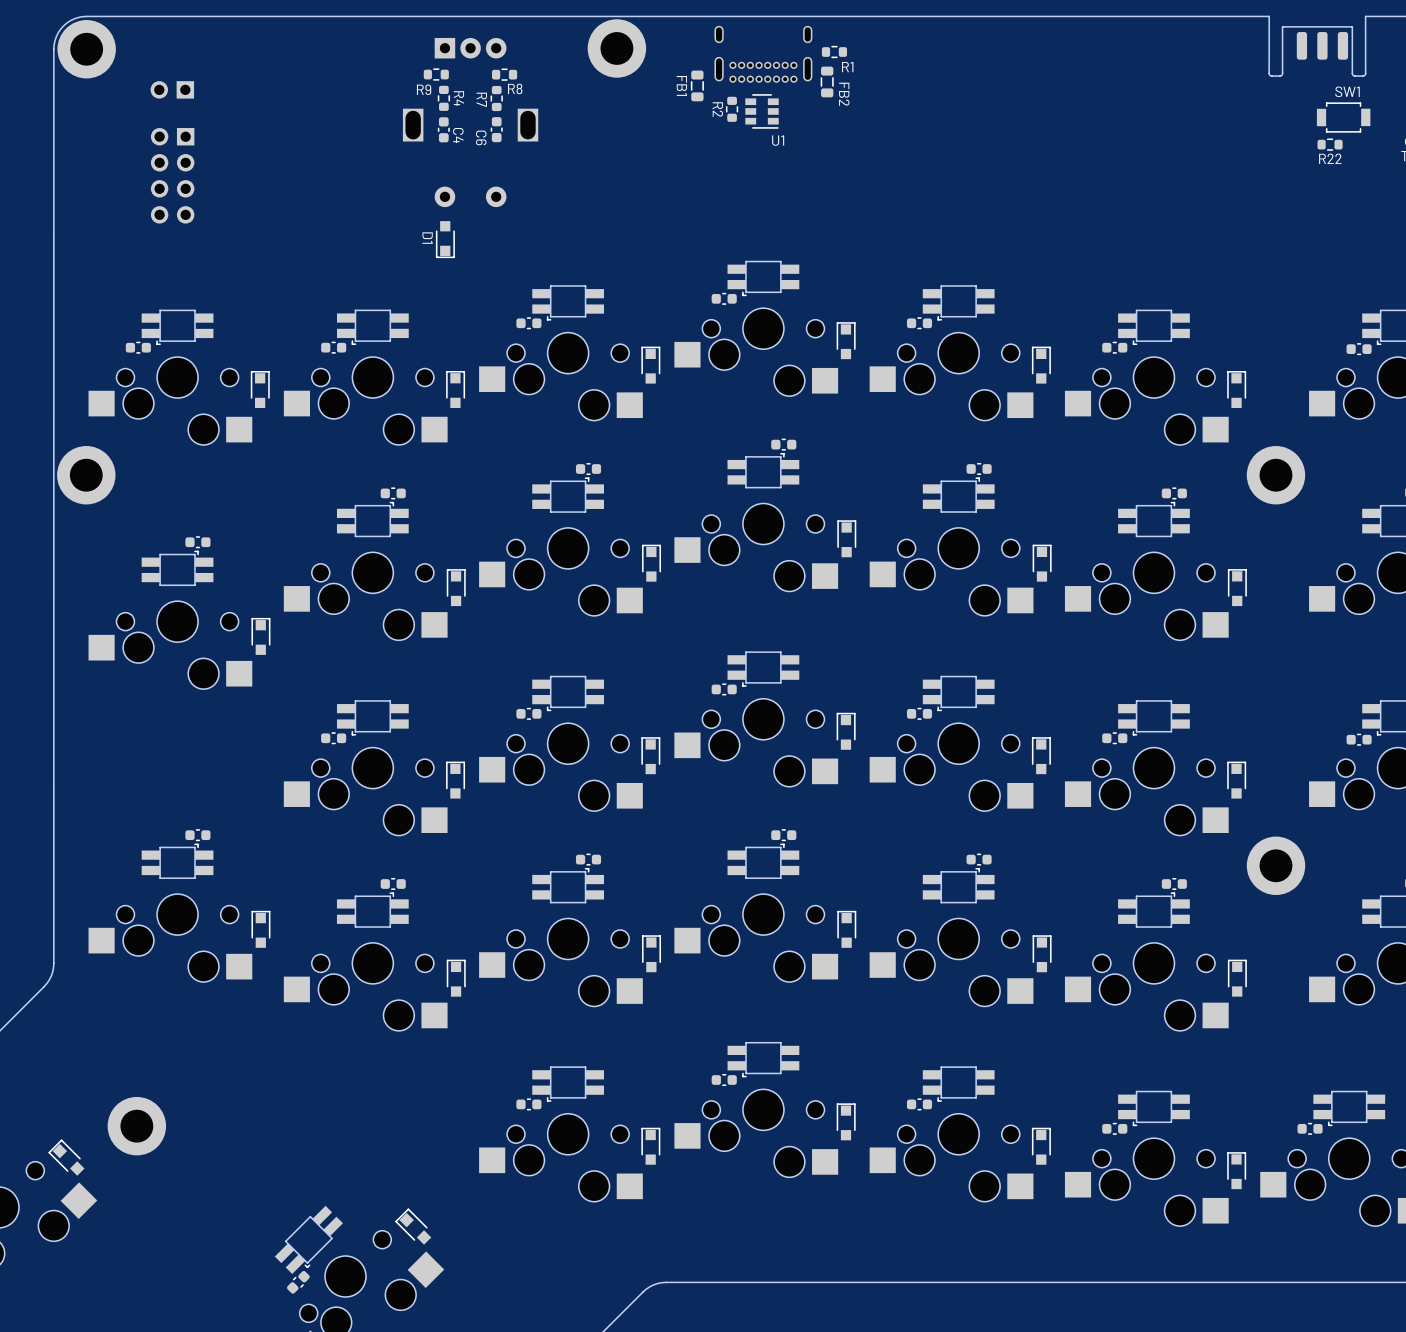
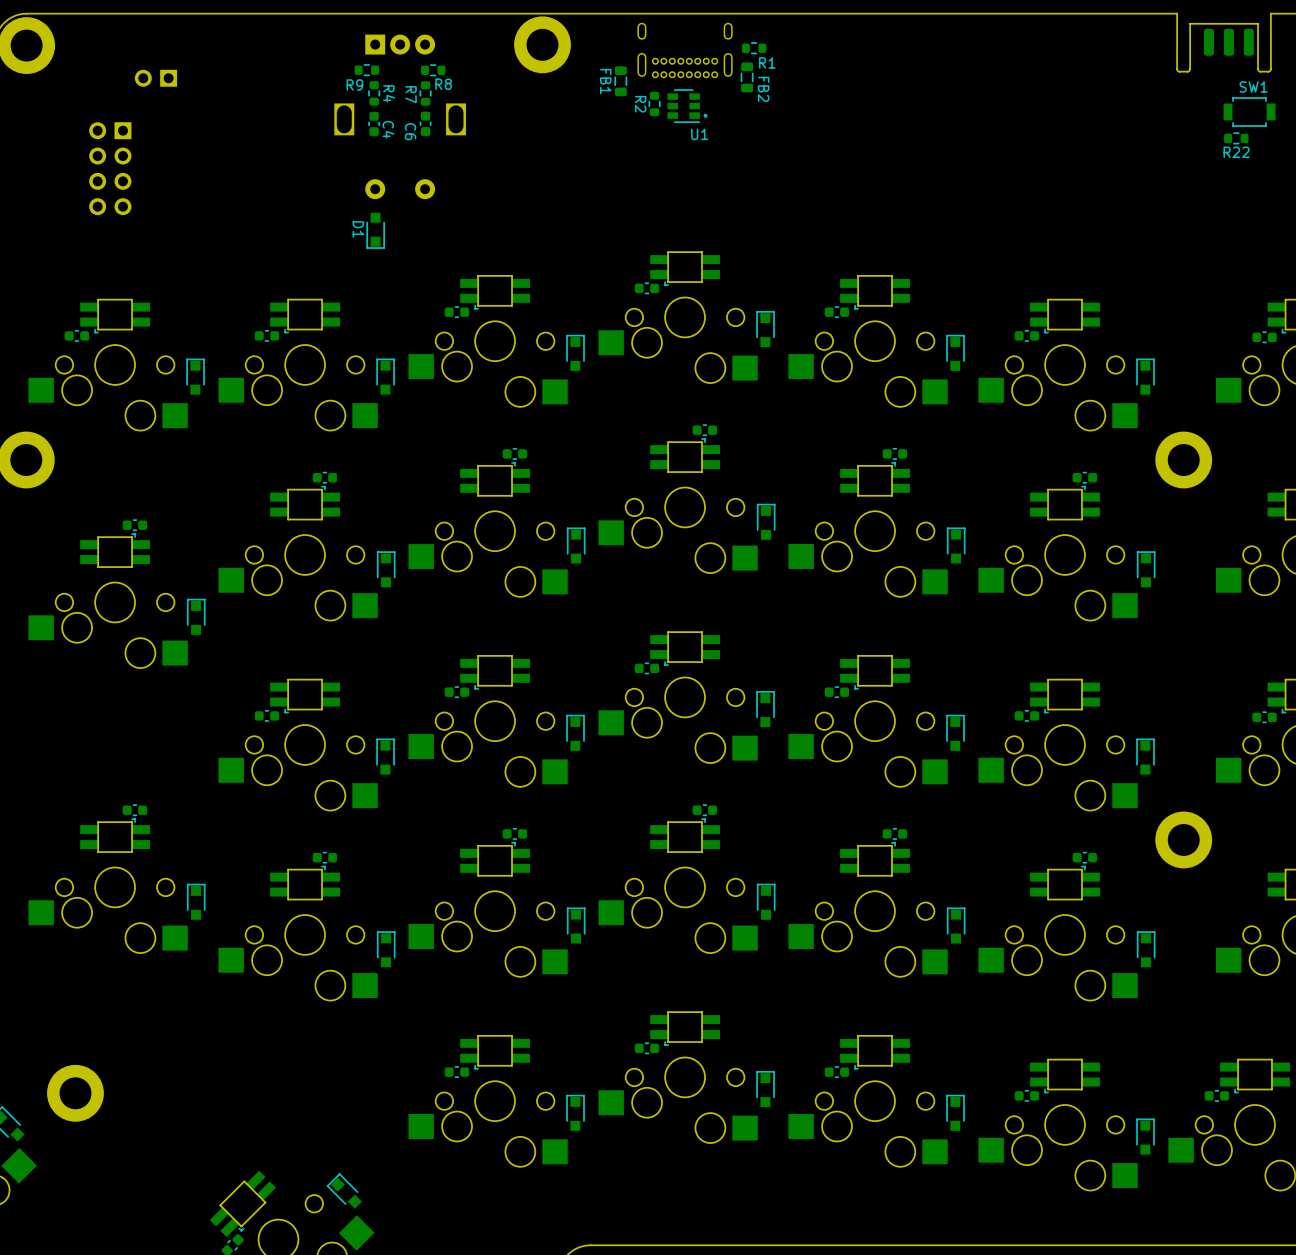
part position: (172, 89) -> (155, 78)
drawing: none -> [703, 113, 708, 118]

